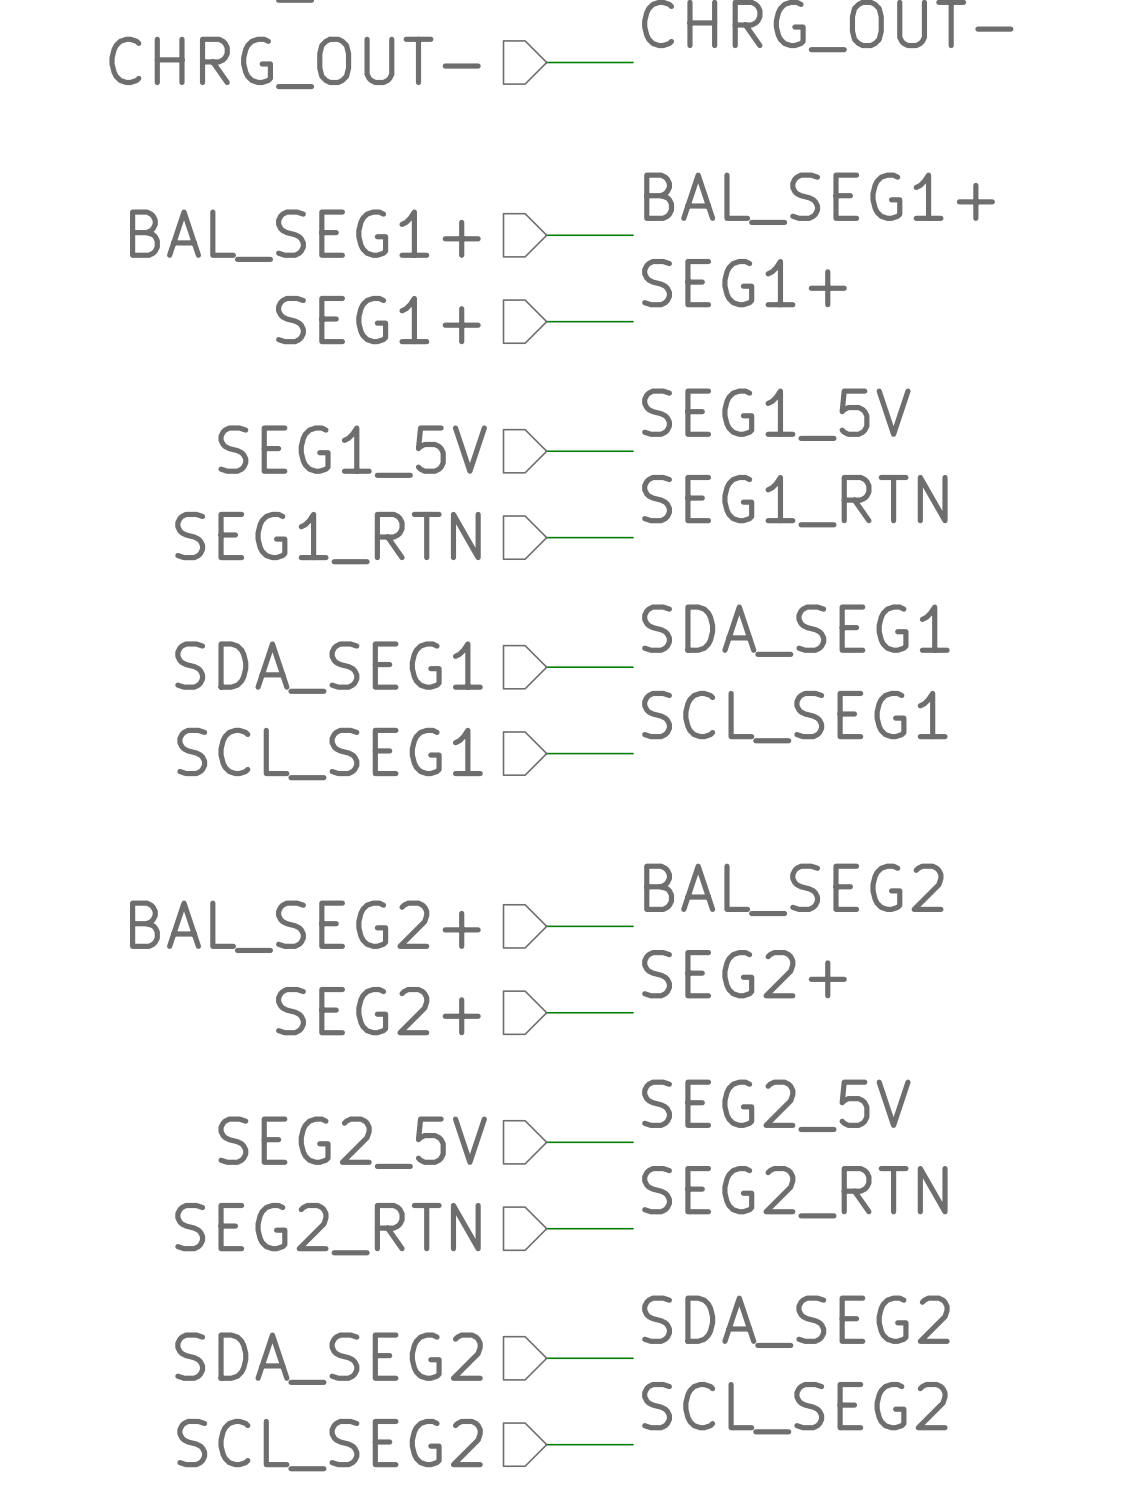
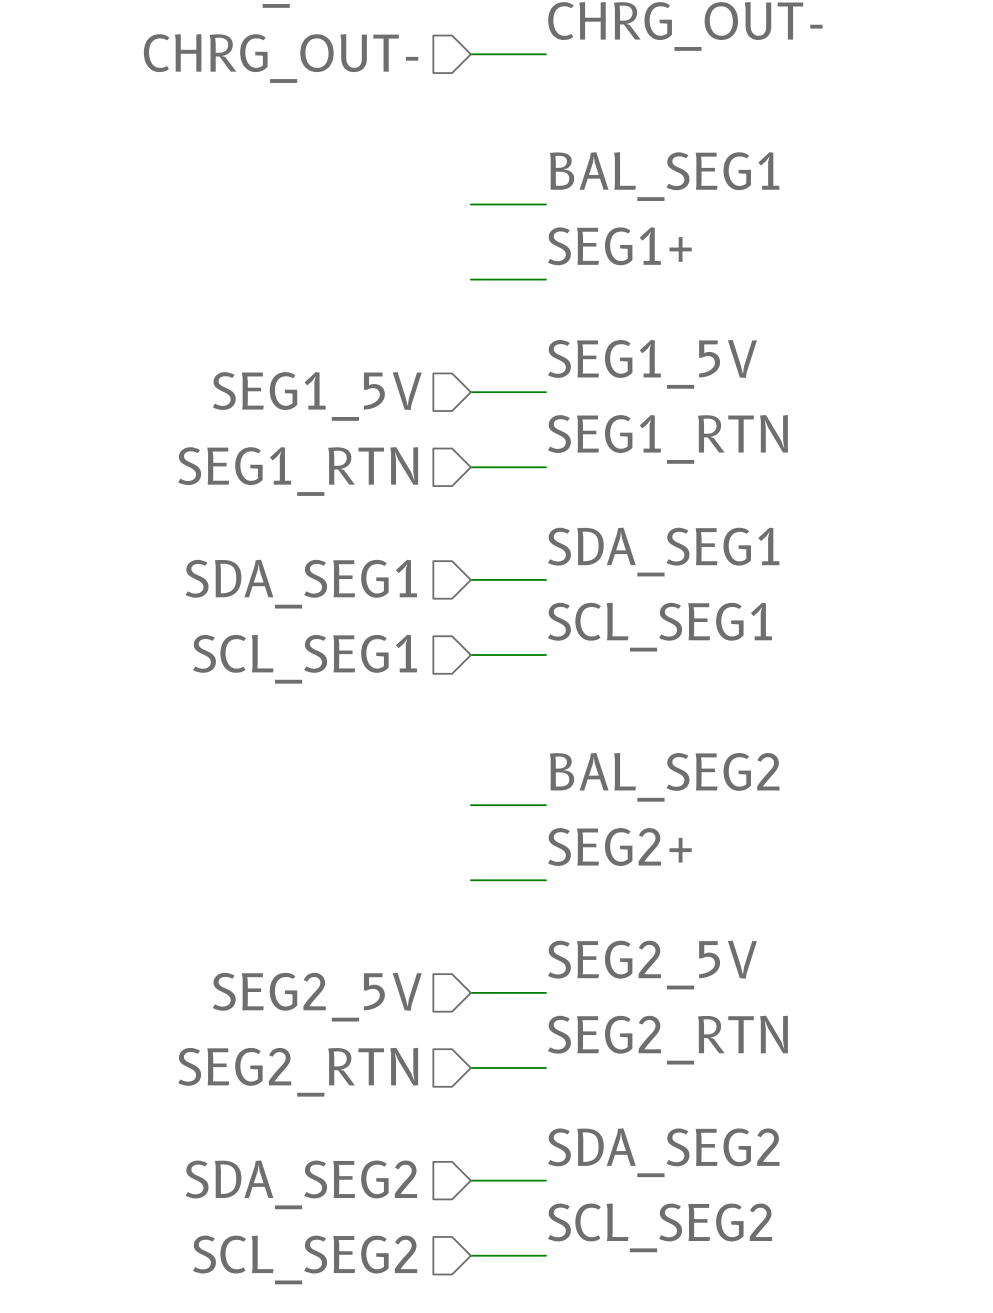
label: BAL_SEG1+ (819, 198) -> BAL_SEG1 (664, 176)
hierarchical label: BAL_SEG1+ (305, 235) -> none
hierarchical label: SEG1+ (378, 320) -> none
hierarchical label: BAL_SEG2+ (305, 926) -> none
hierarchical label: SEG2+ (378, 1011) -> none

